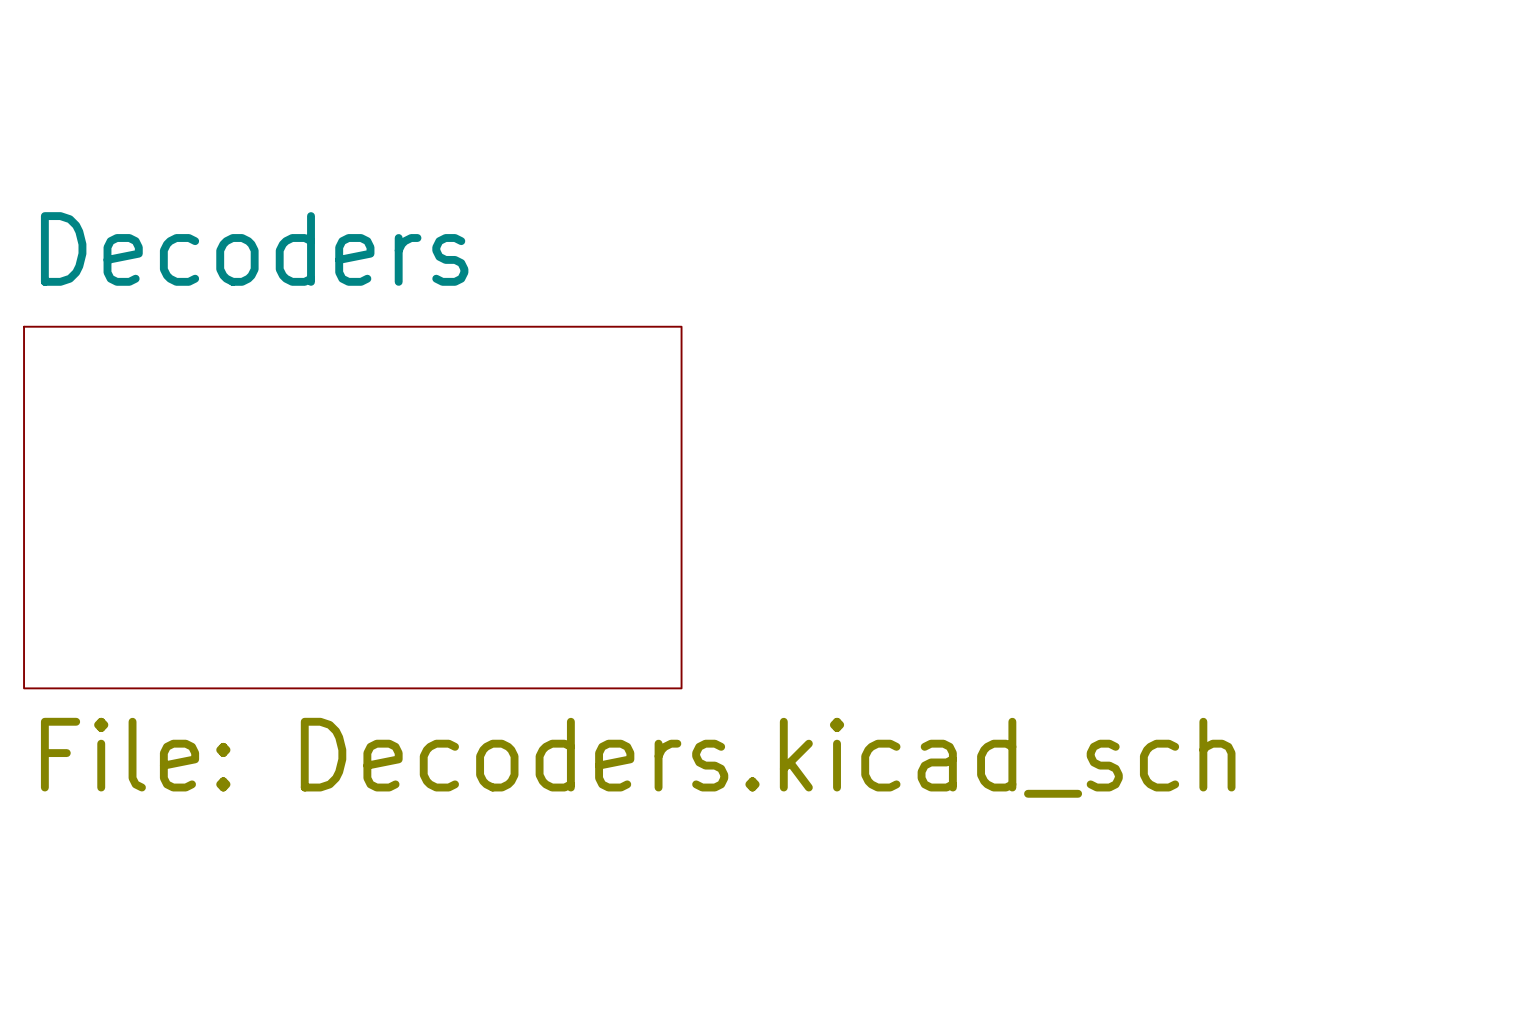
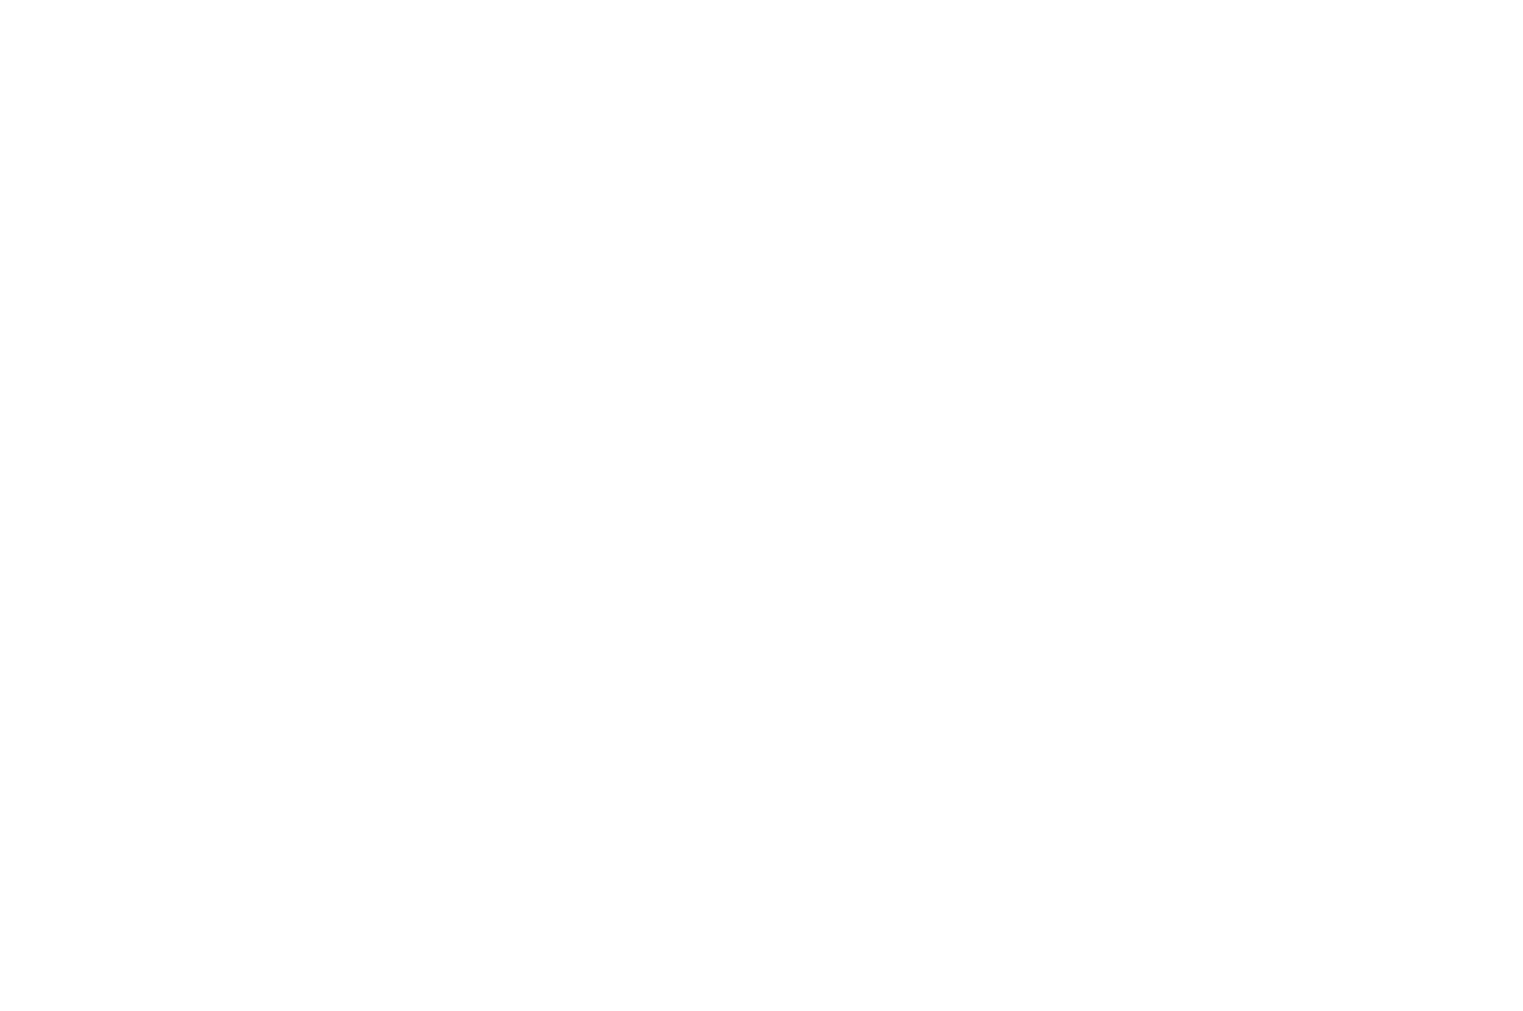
sheet Decoders: File: Decoders.kicad_sch (352, 507) -> none

